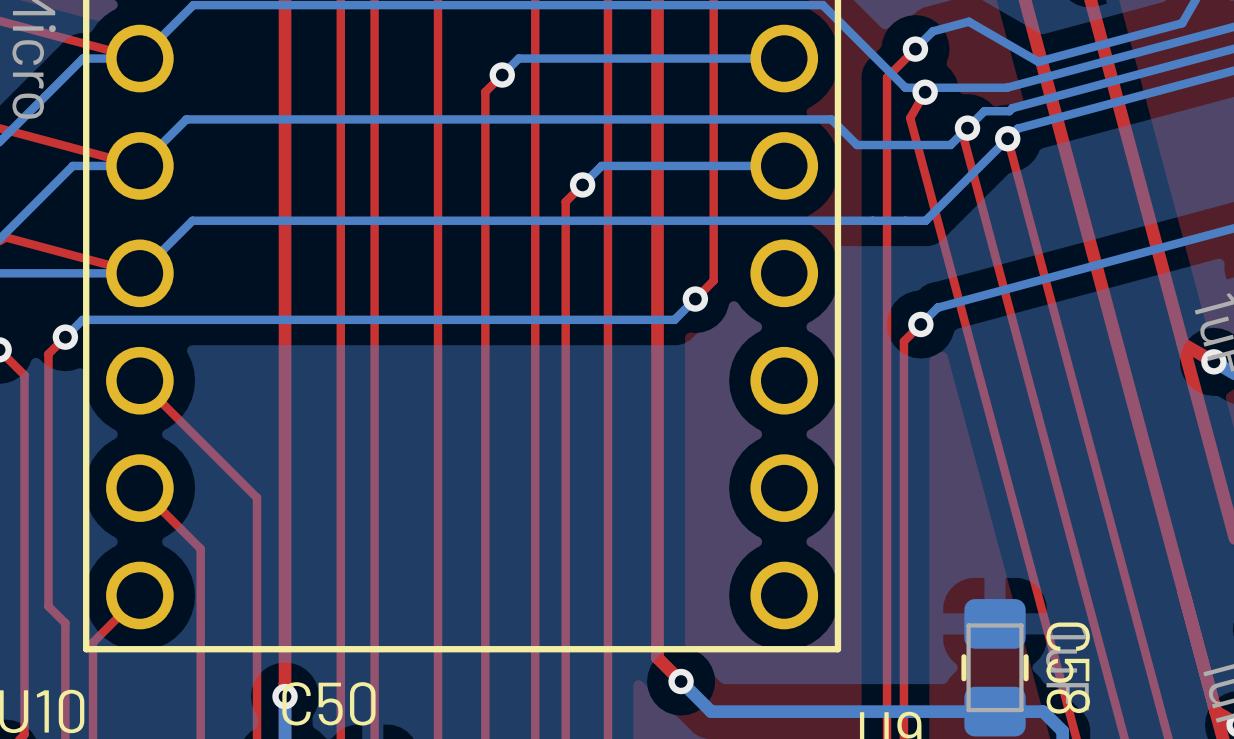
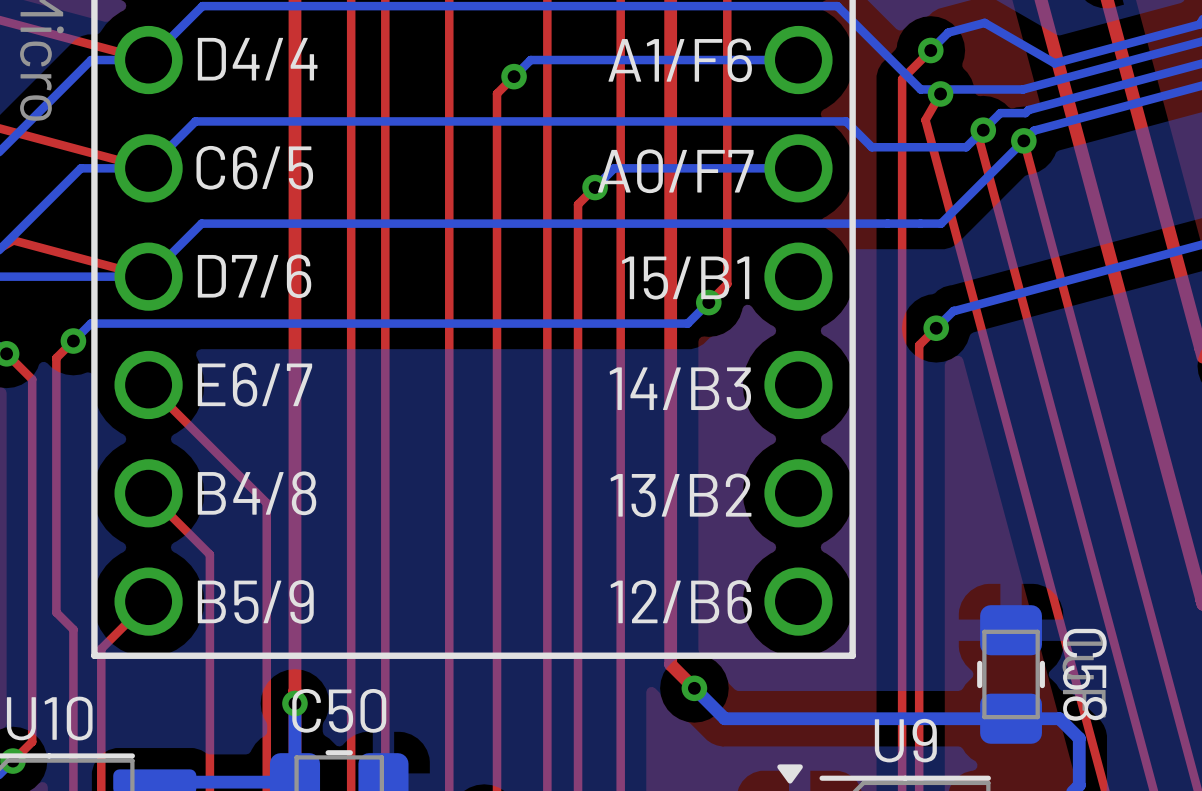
text: none -> D4/4 (257, 59)
text: none -> A1/F6 (680, 60)
text: none -> C6/5 (254, 167)
text: none -> A0/F7 (675, 171)
text: none -> D7/6 (254, 276)
text: none -> 15/B1 (685, 278)
text: none -> E6/7 (254, 384)
text: none -> 14/B3 (680, 388)
text: none -> B4/8 (257, 493)
text: none -> 13/B2 (681, 495)
text: none -> B5/9 (255, 601)
text: none -> 12/B6 (681, 601)

